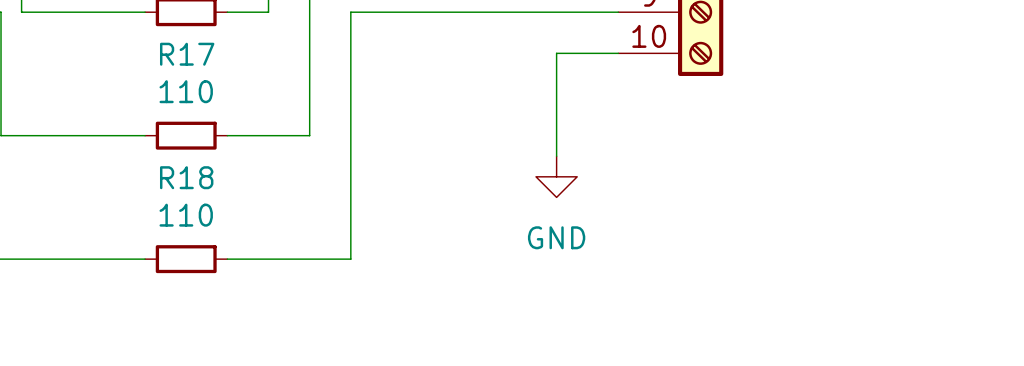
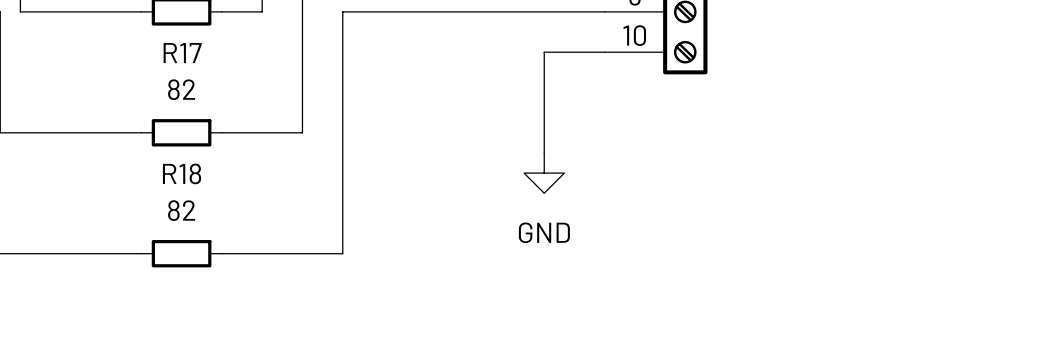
R17 value: 110 (186, 91) -> 82 (181, 89)
R18 value: 110 (186, 215) -> 82 (181, 210)

